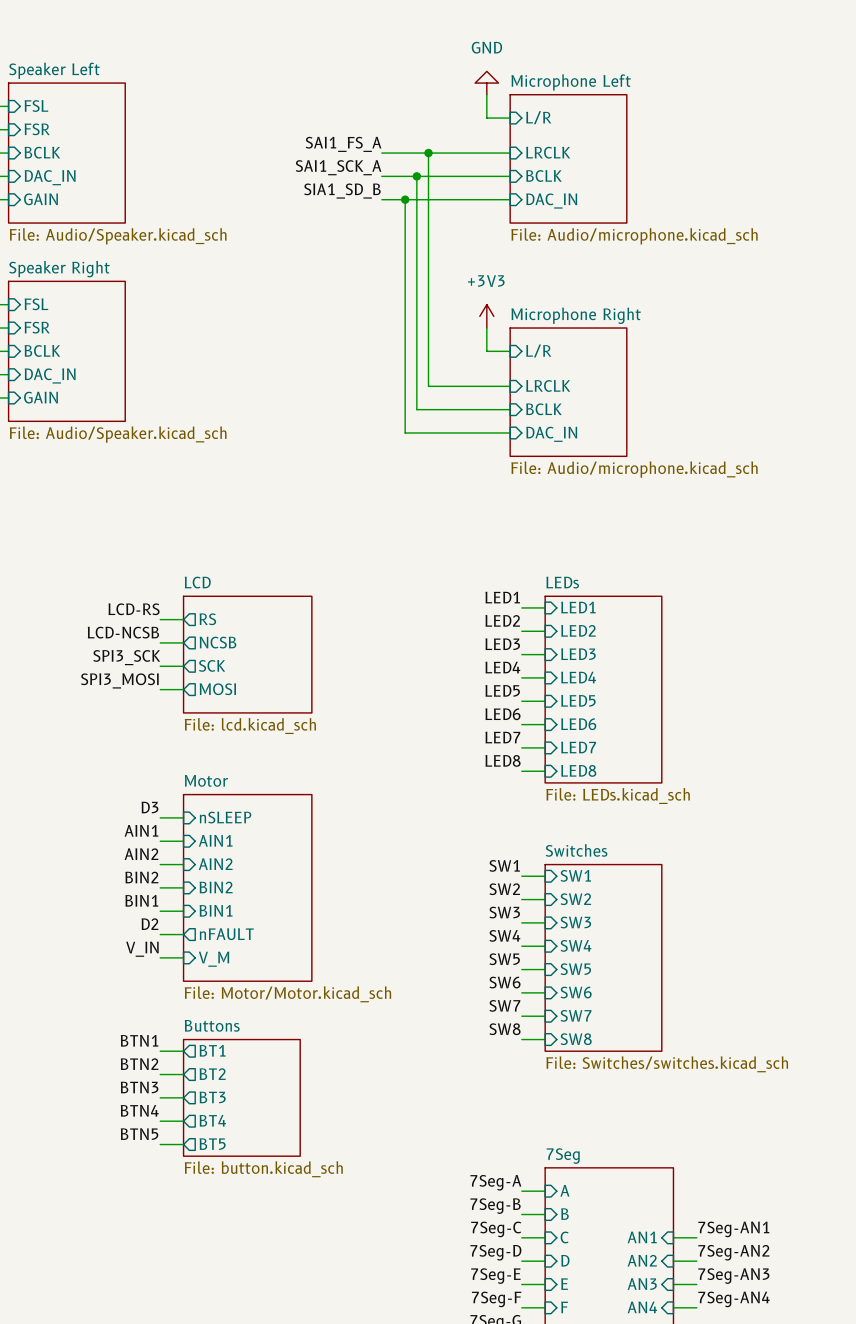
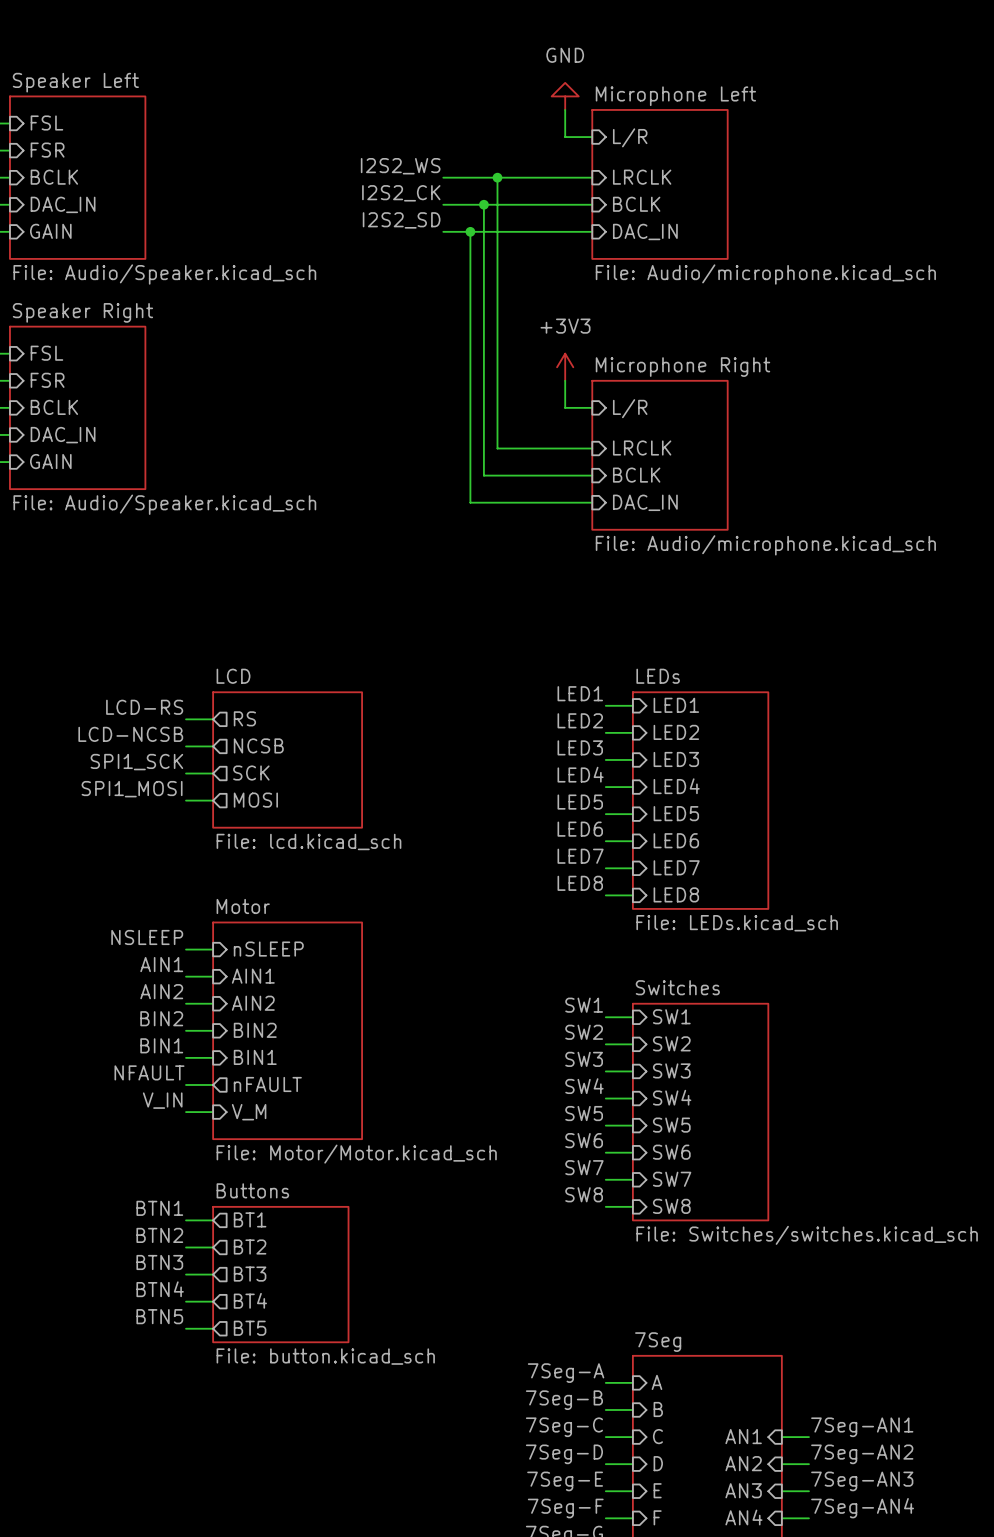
label: SAI1_FS_A (343, 144) -> I2S2_WS (400, 166)
label: SAI1_SCK_A (338, 167) -> I2S2_CK (401, 193)
label: SIA1_SD_B (342, 191) -> I2S2_SD (401, 220)
label: SPI3_SCK (126, 657) -> SPI1_SCK (136, 762)
label: SPI3_MOSI (119, 680) -> SPI1_MOSI (132, 789)
label: D3 (149, 807) -> NSLEEP (147, 937)
label: D2 (149, 924) -> NFAULT (149, 1072)

